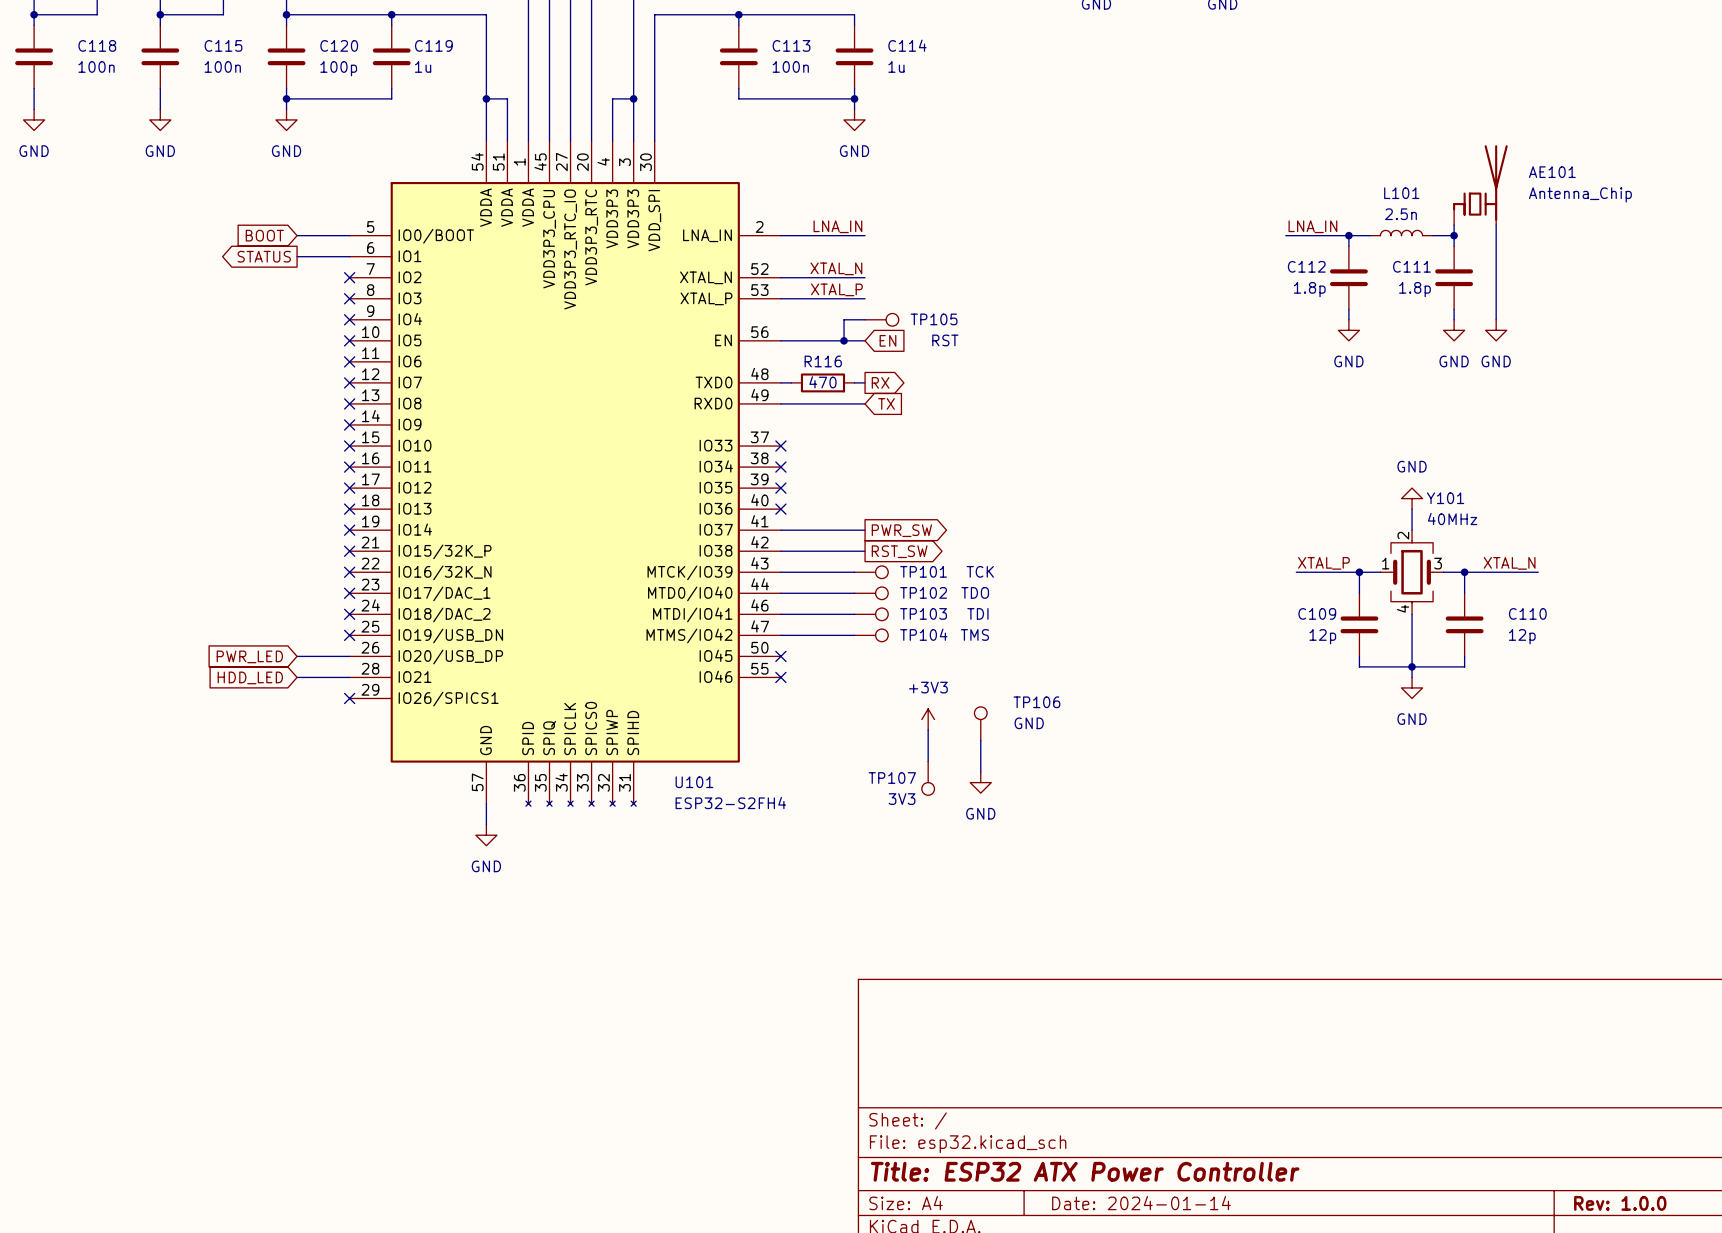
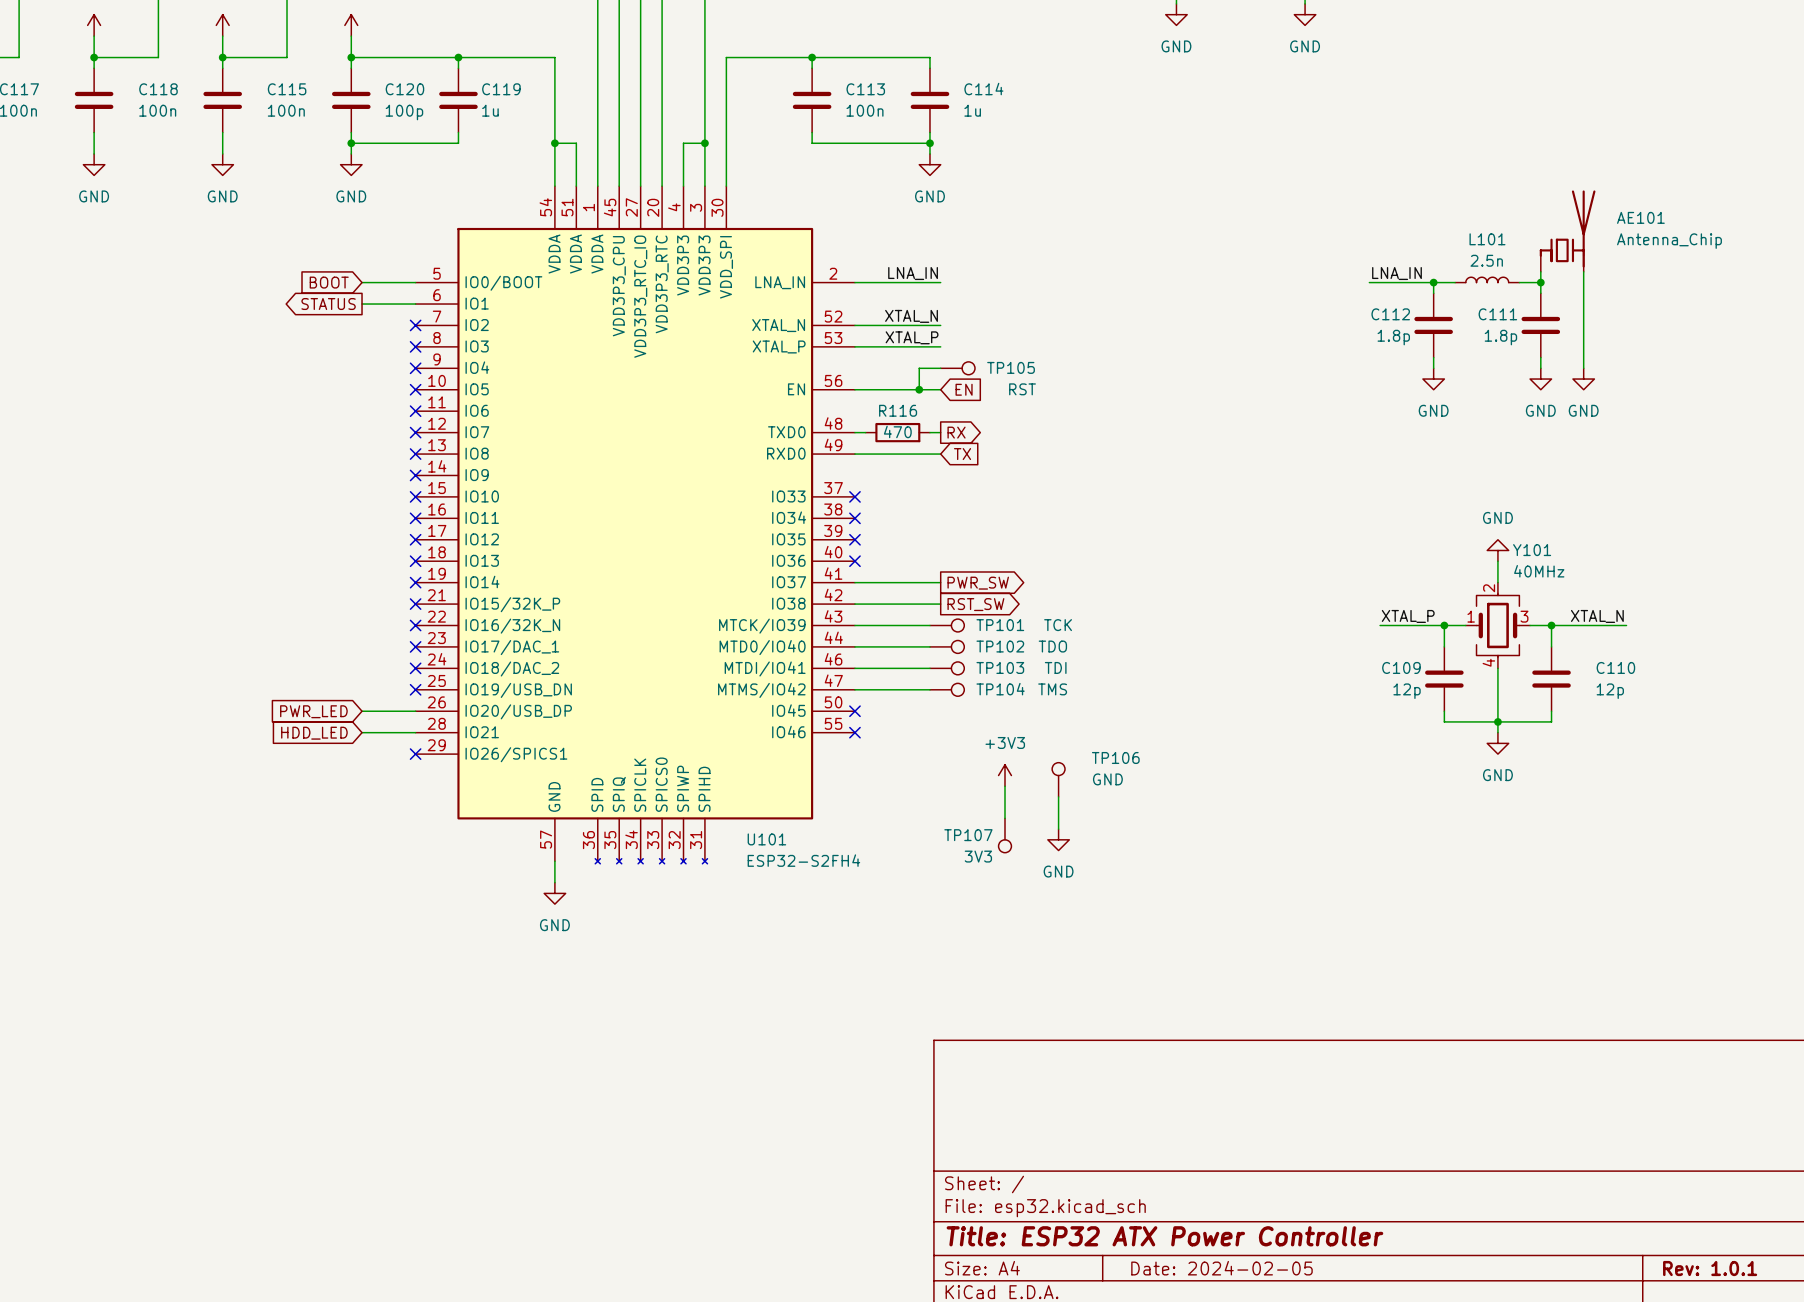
title block: Date: 2024-01-14 (1141, 1203) -> Date: 2024-02-05 (1221, 1268)
title block: Rev: 1.0.0 (1620, 1203) -> Rev: 1.0.1 (1710, 1268)

